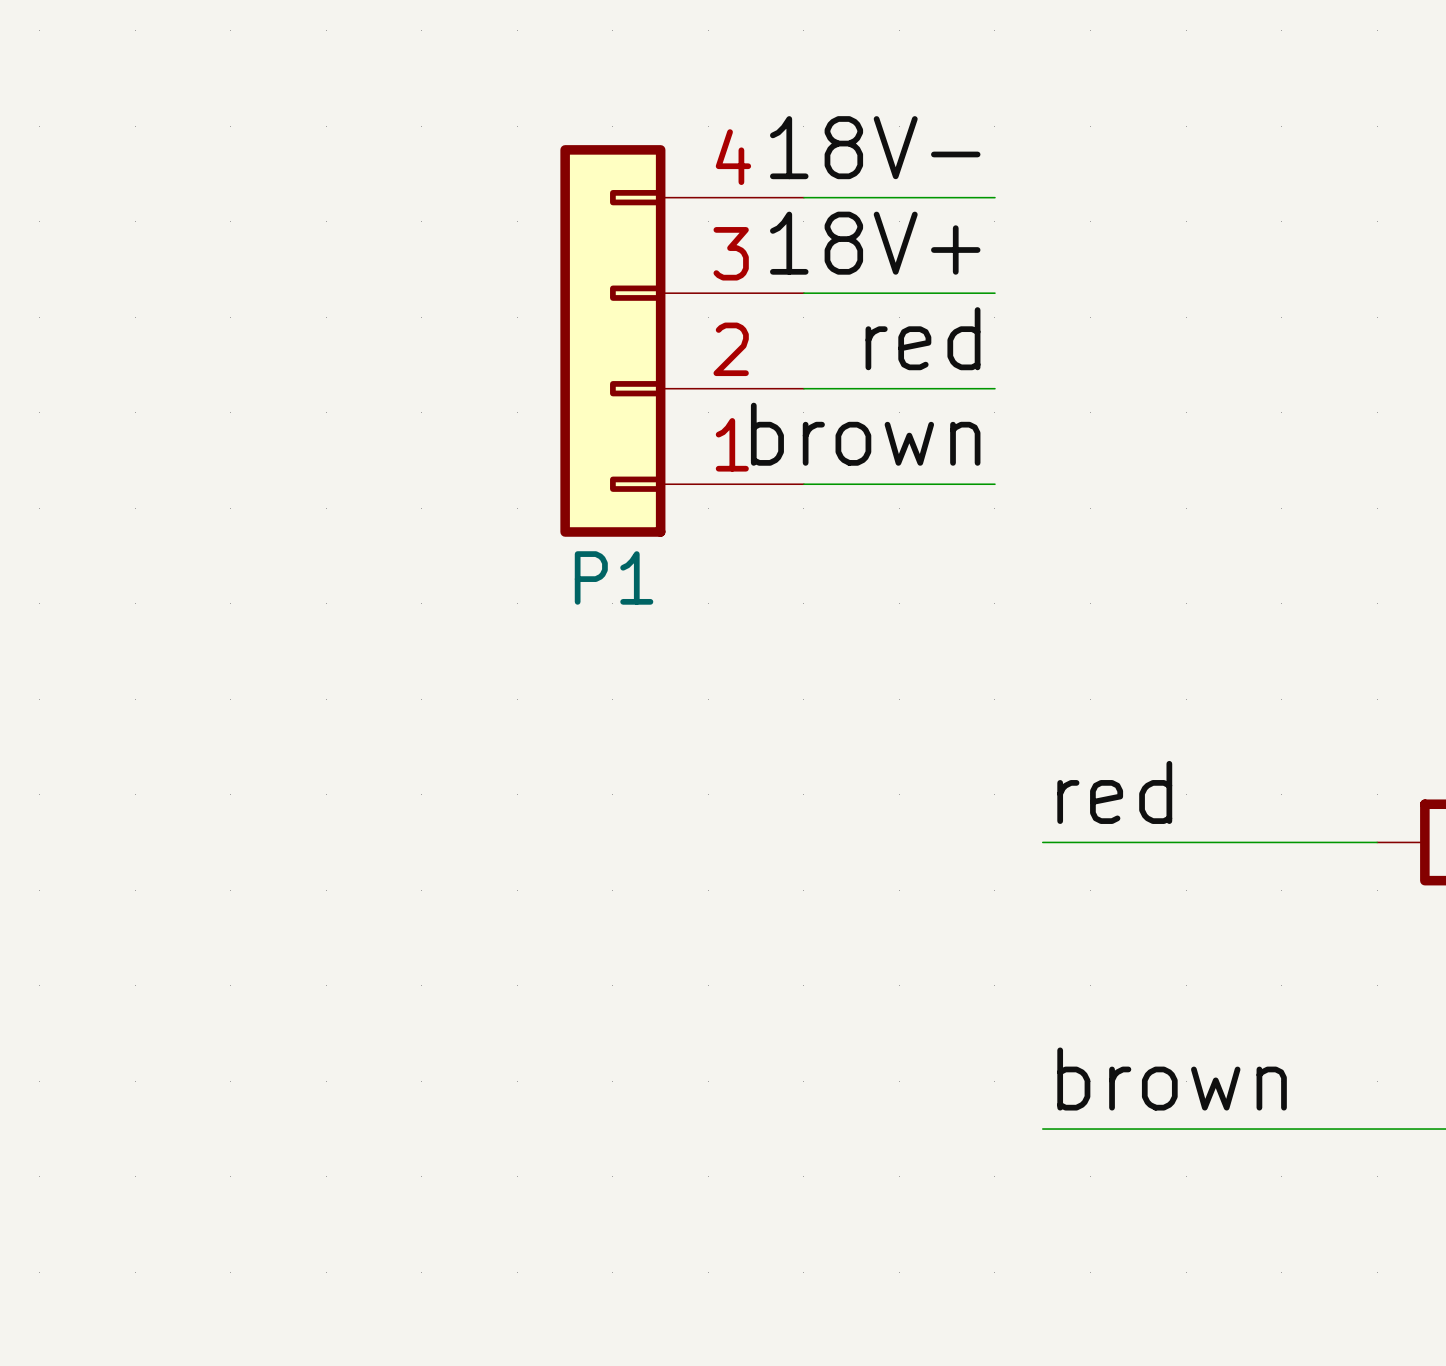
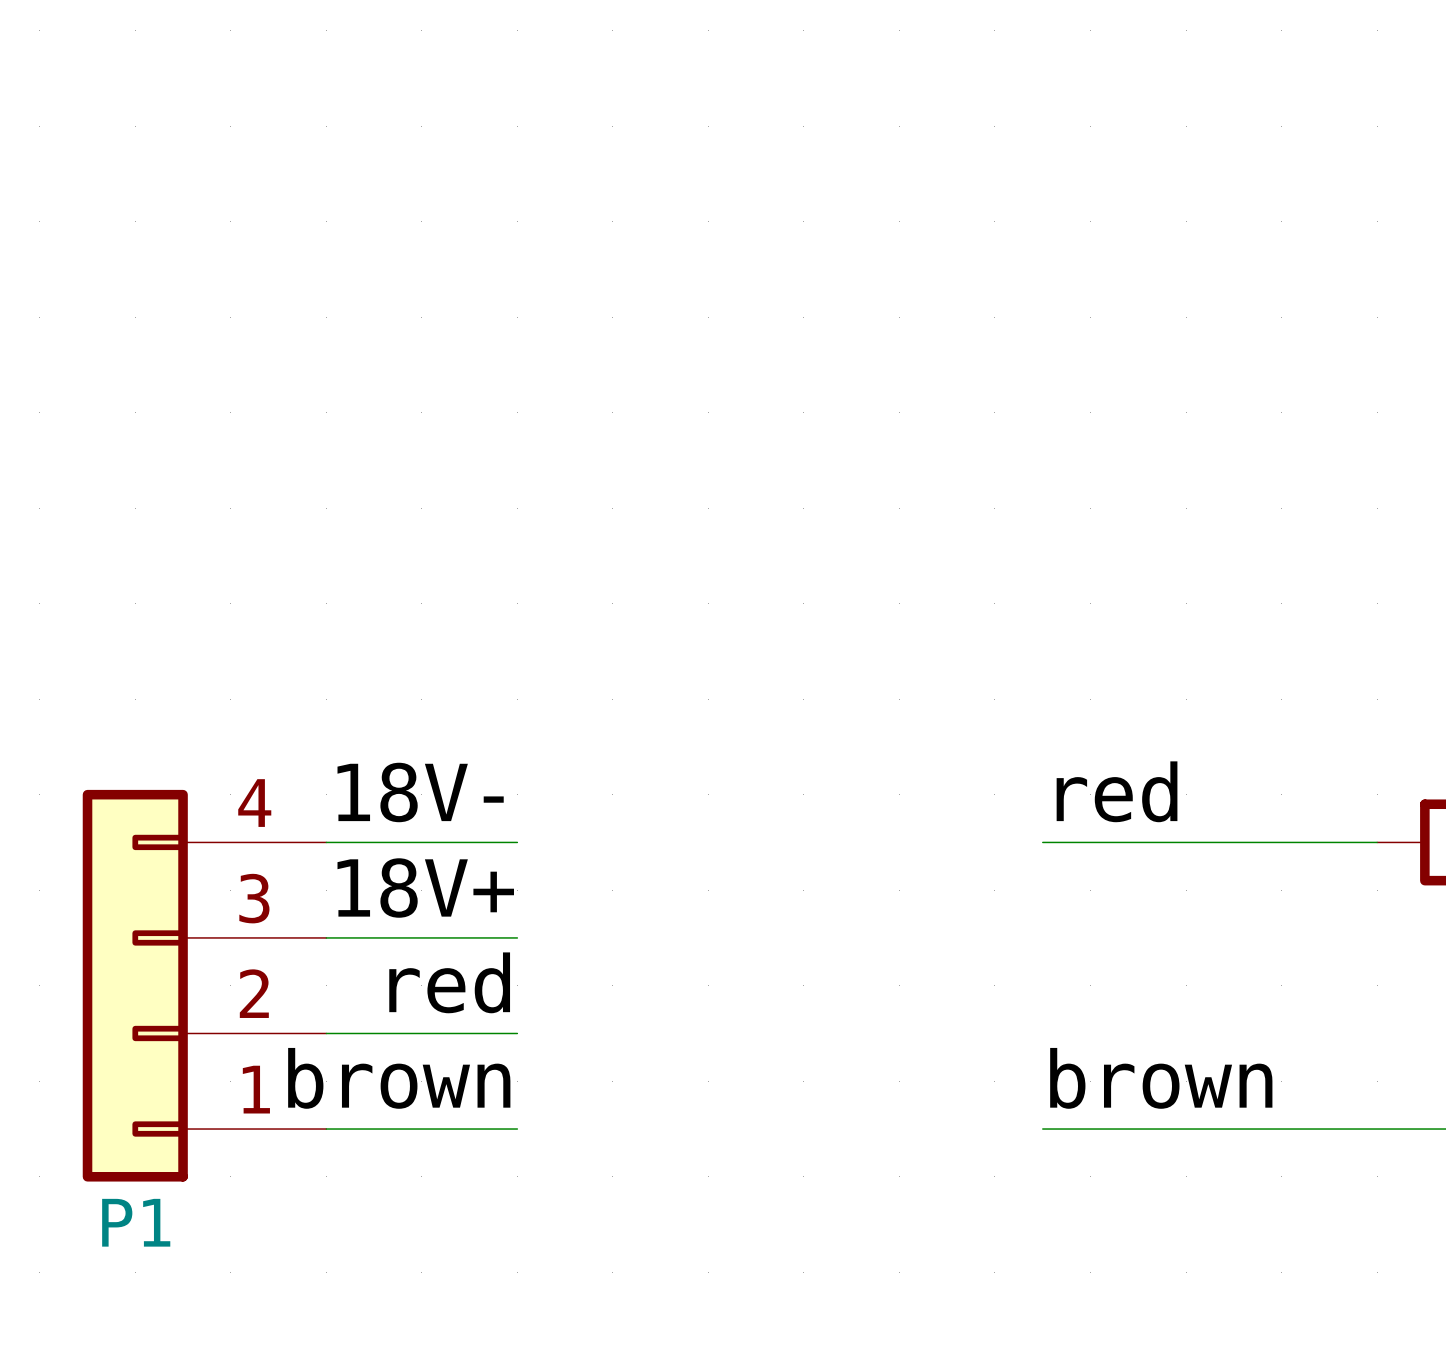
label position: 18V- (875, 147) -> 18V- (420, 792)
wire: (803, 197) (994, 197) -> (326, 842) (517, 842)
label position: 18V+ (875, 243) -> 18V+ (425, 888)
wire: (803, 293) (994, 293) -> (326, 937) (517, 937)
label position: red (922, 338) -> red (449, 982)
P1 position: (682, 340) -> (204, 985)
wire: (803, 388) (994, 388) -> (326, 1033) (517, 1033)
label position: brown (865, 434) -> brown (399, 1078)
wire: (803, 484) (994, 484) -> (326, 1129) (517, 1129)

